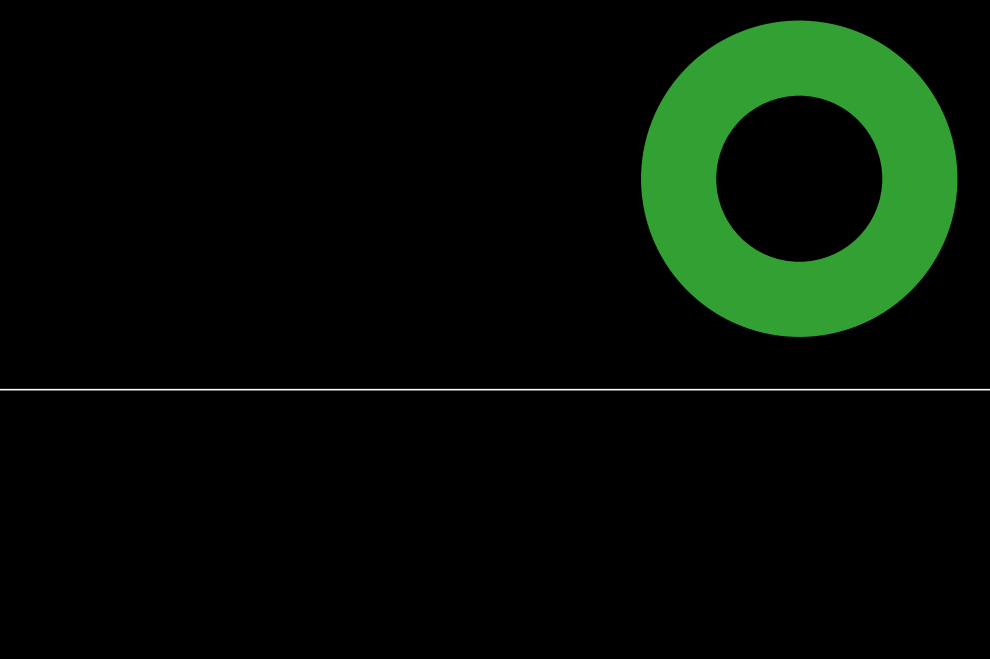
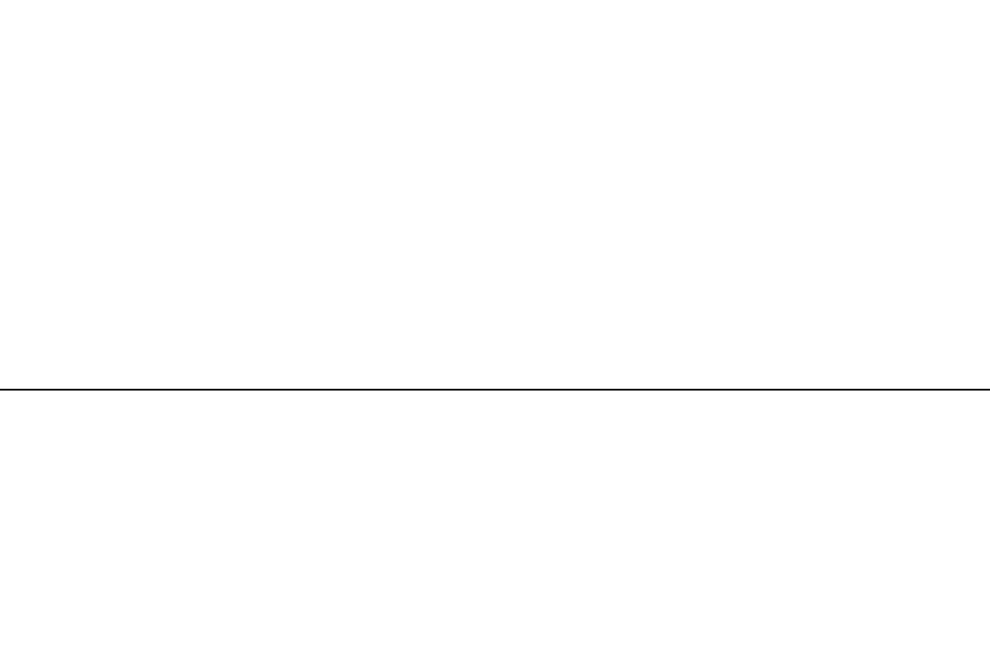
part: (799, 178) -> none

